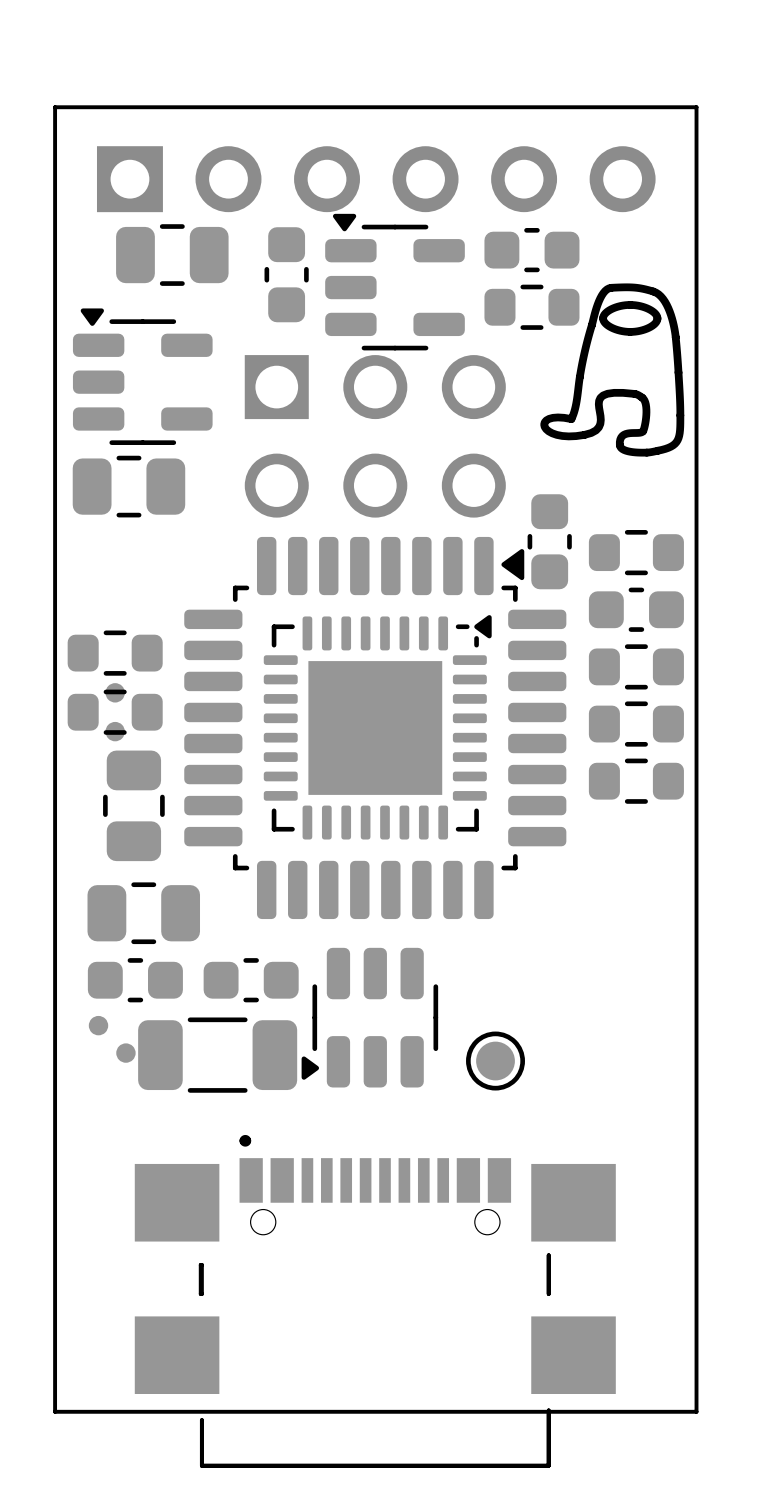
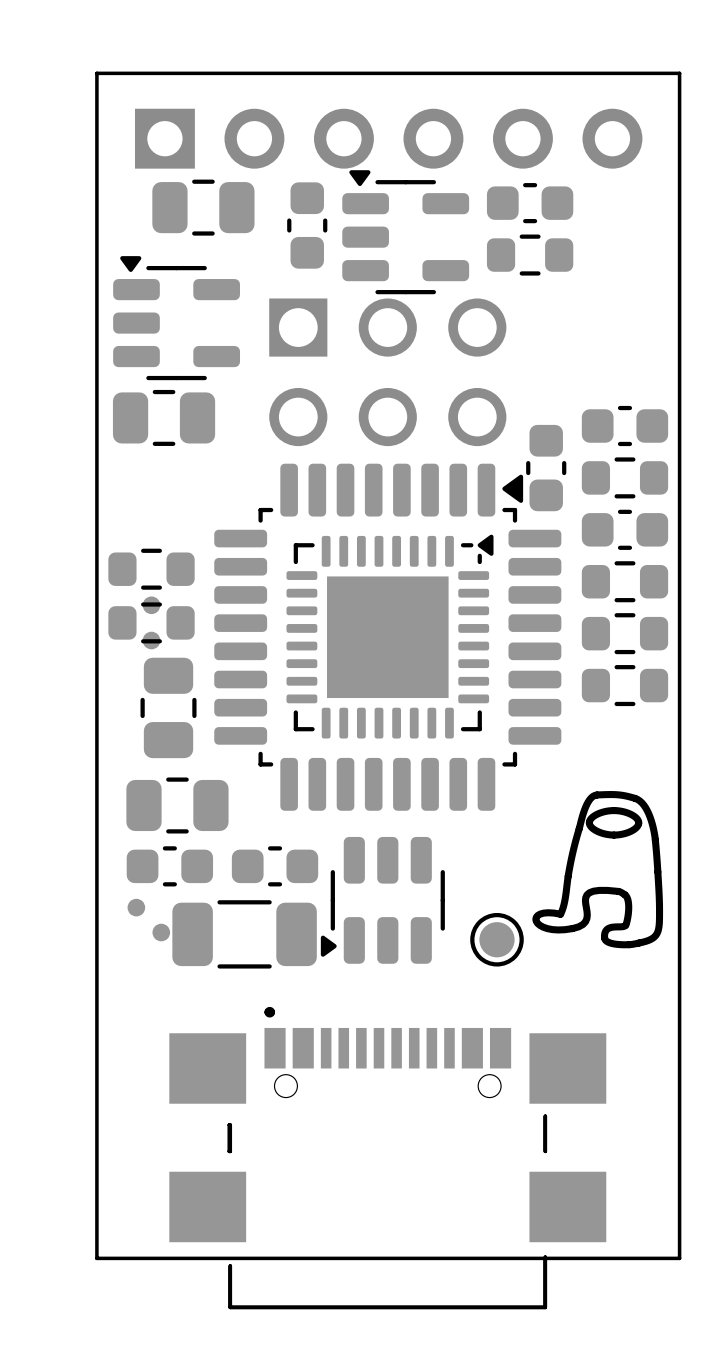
drawing position: (612, 369) -> (597, 869)
part: none -> (624, 426)

